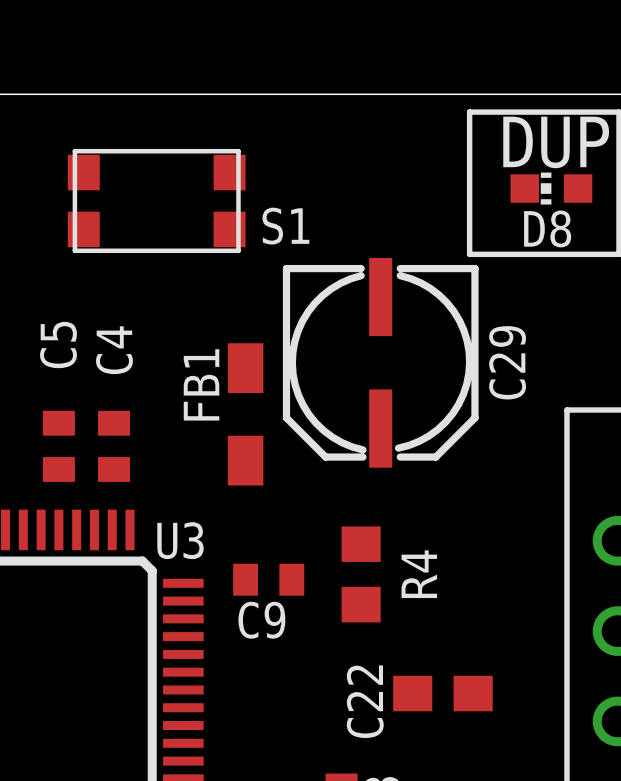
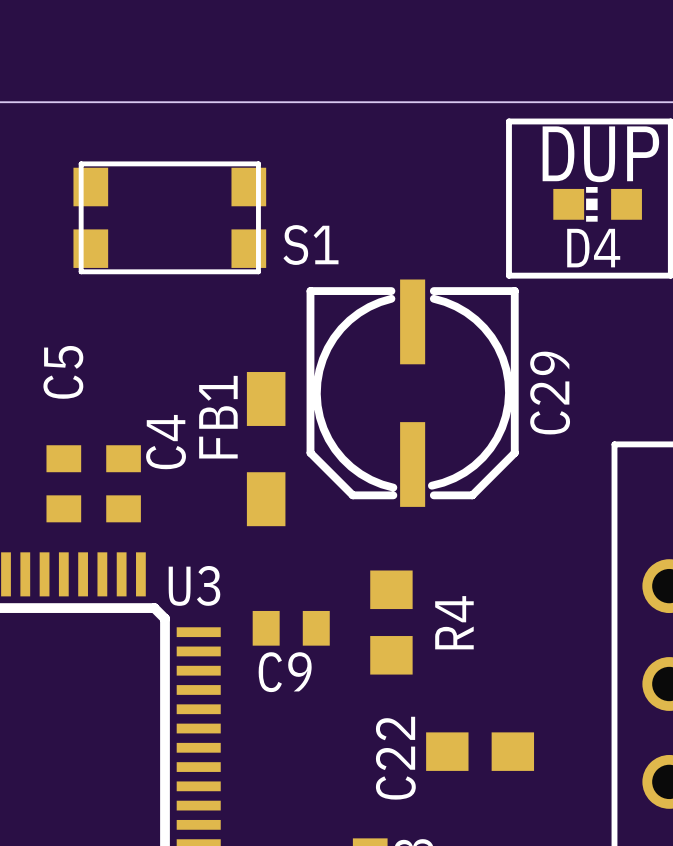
D8 name: D8 (547, 228) -> D4 (593, 248)
C4 name position: C4 (114, 350) -> C4 (166, 442)

